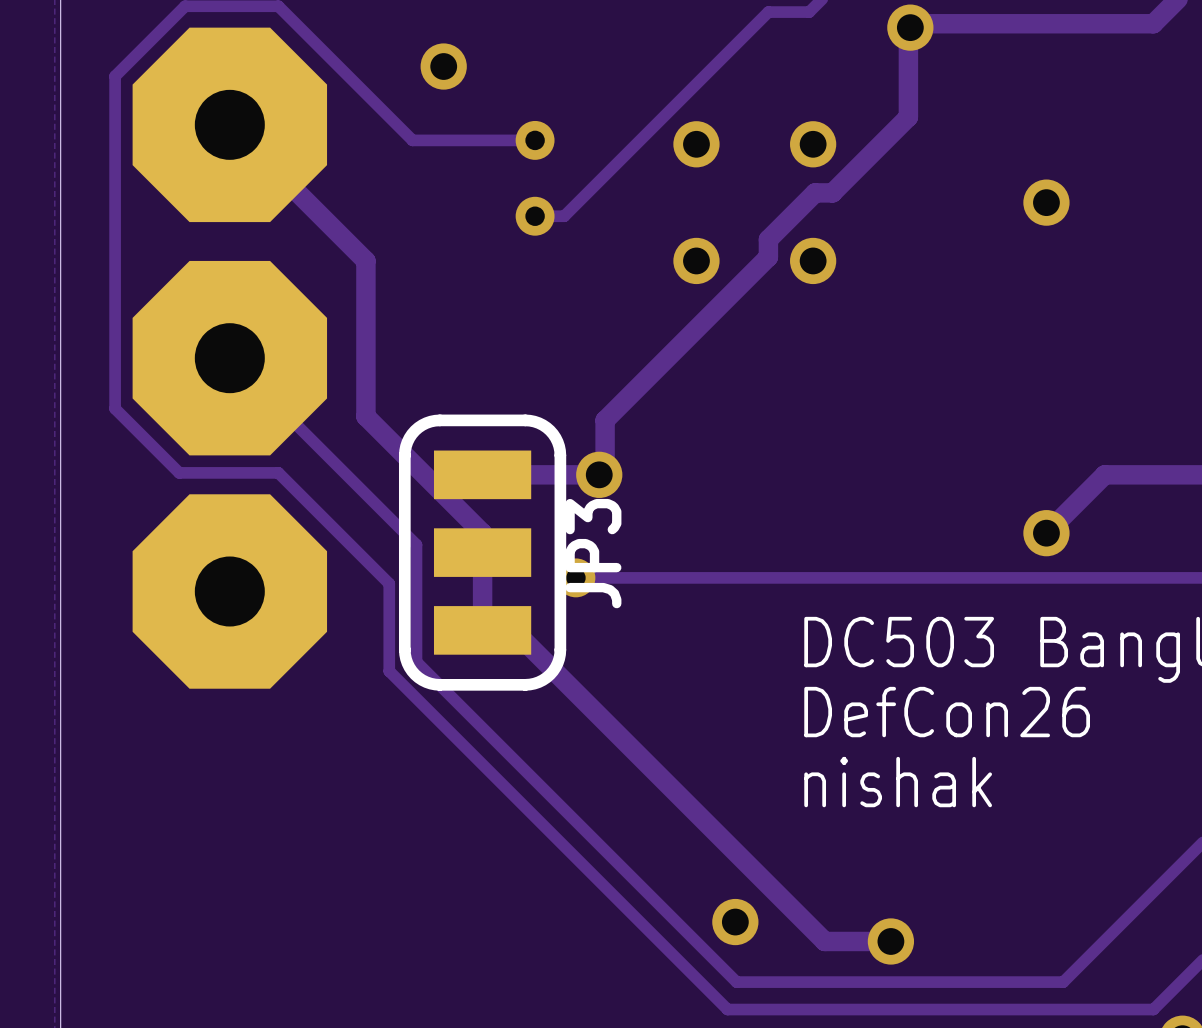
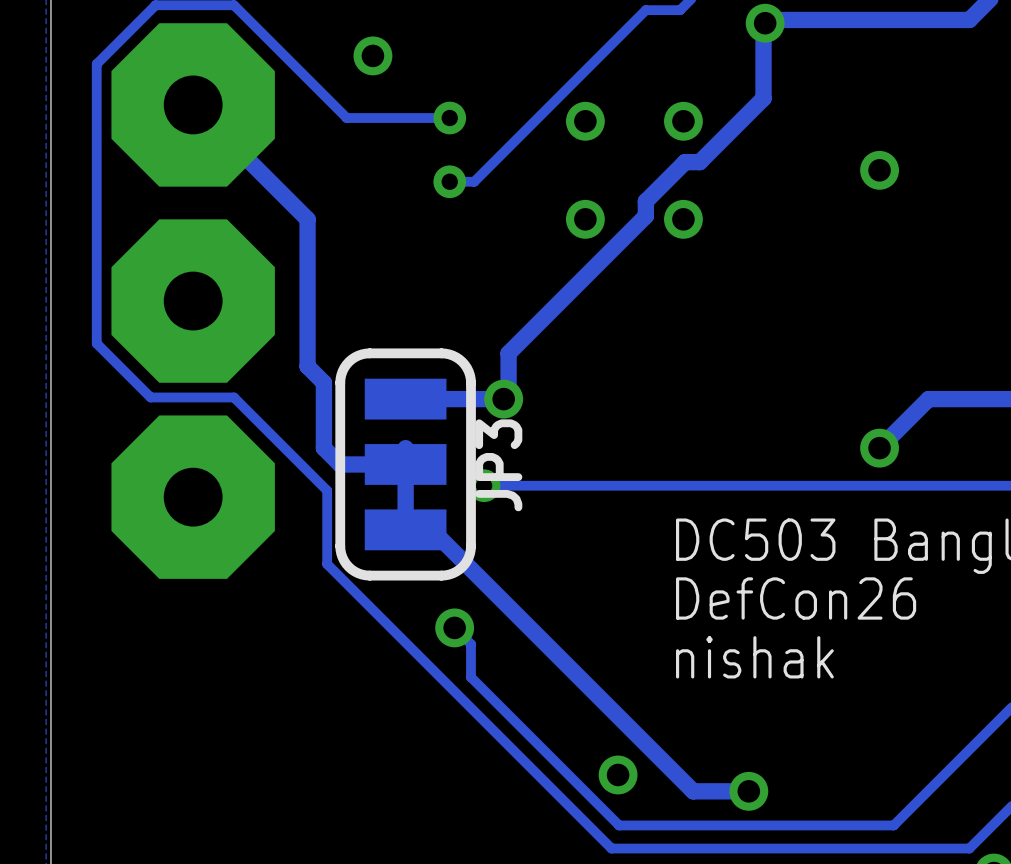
track: (229, 358) (416, 544) (416, 661) (560, 805) -> (454, 627) (471, 644) (471, 677)
track: (365, 416) (482, 533) -> (307, 350) (307, 366) (323, 382) (323, 448) (340, 464) (431, 464) (405, 464)
via: none -> (454, 627)

